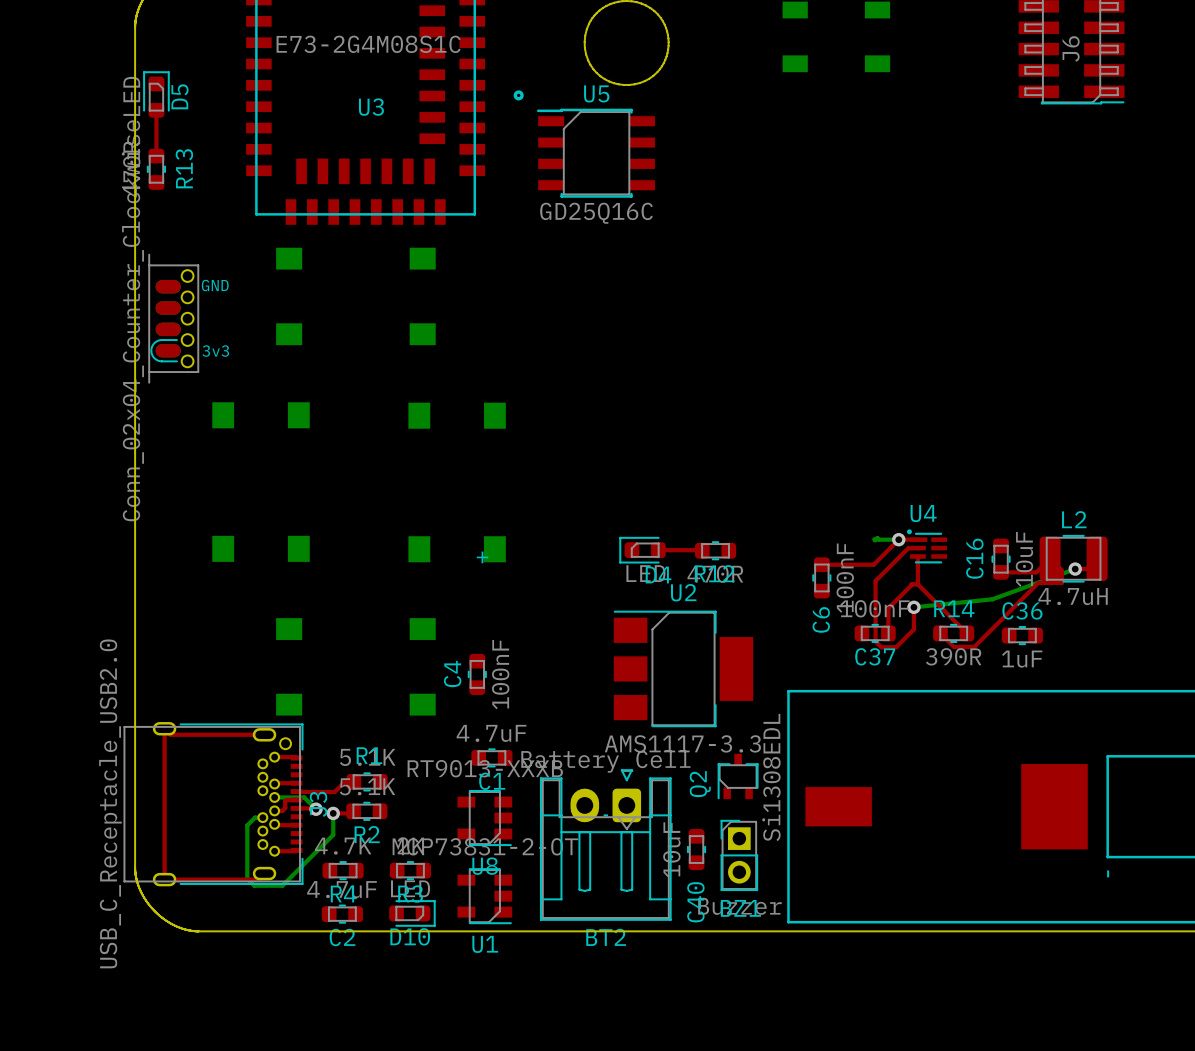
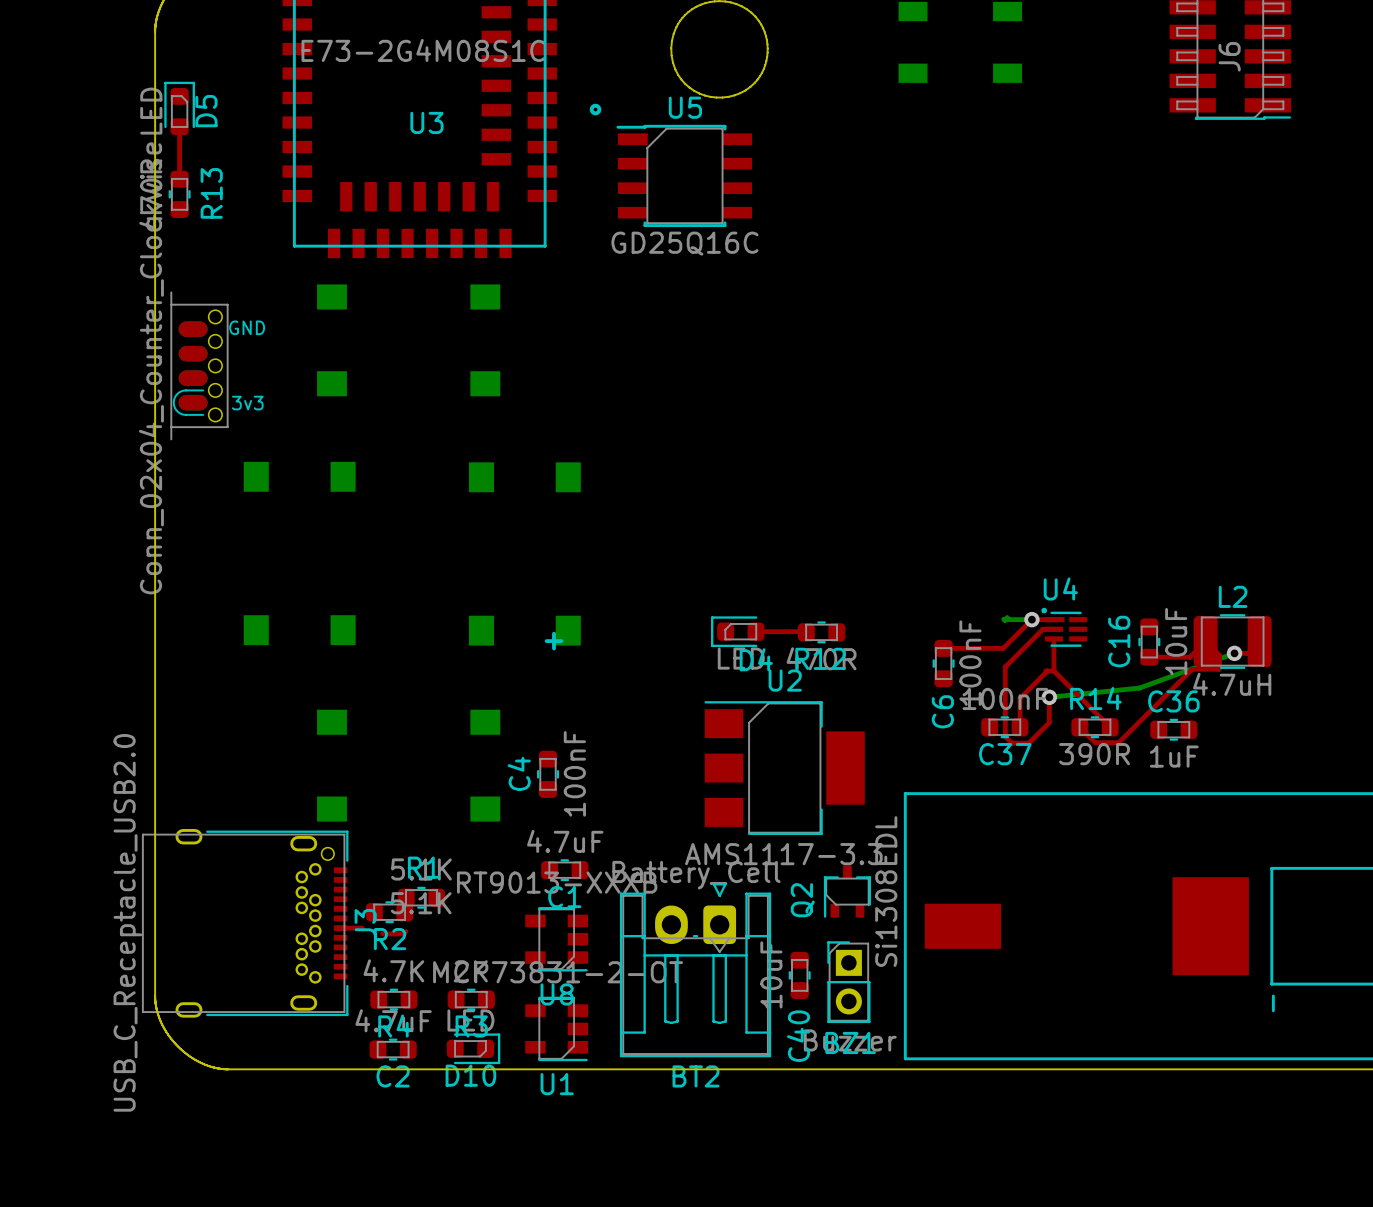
top track: (264, 734) (170, 734) (164, 728) (164, 879) (258, 879) (264, 873) -> none
top track: (274, 757) (296, 757) -> none
top track: (353, 781) (344, 781) (334, 792) (296, 791) -> none
top track: (296, 783) (274, 784) -> none
bottom track: (274, 797) (304, 797) (316, 809) -> none
top track: (296, 799) (286, 799) (285, 807) (282, 810) (274, 810) -> none
via: (316, 809) -> none
R2 position: (366, 811) -> (389, 912)
bottom track: (333, 813) (333, 834) (282, 885) (254, 885) (247, 878) (247, 825) (255, 817) (262, 817) -> none
via: (333, 813) -> none
top track: (274, 824) (296, 825) -> none
top track: (296, 850) (274, 851) -> none

